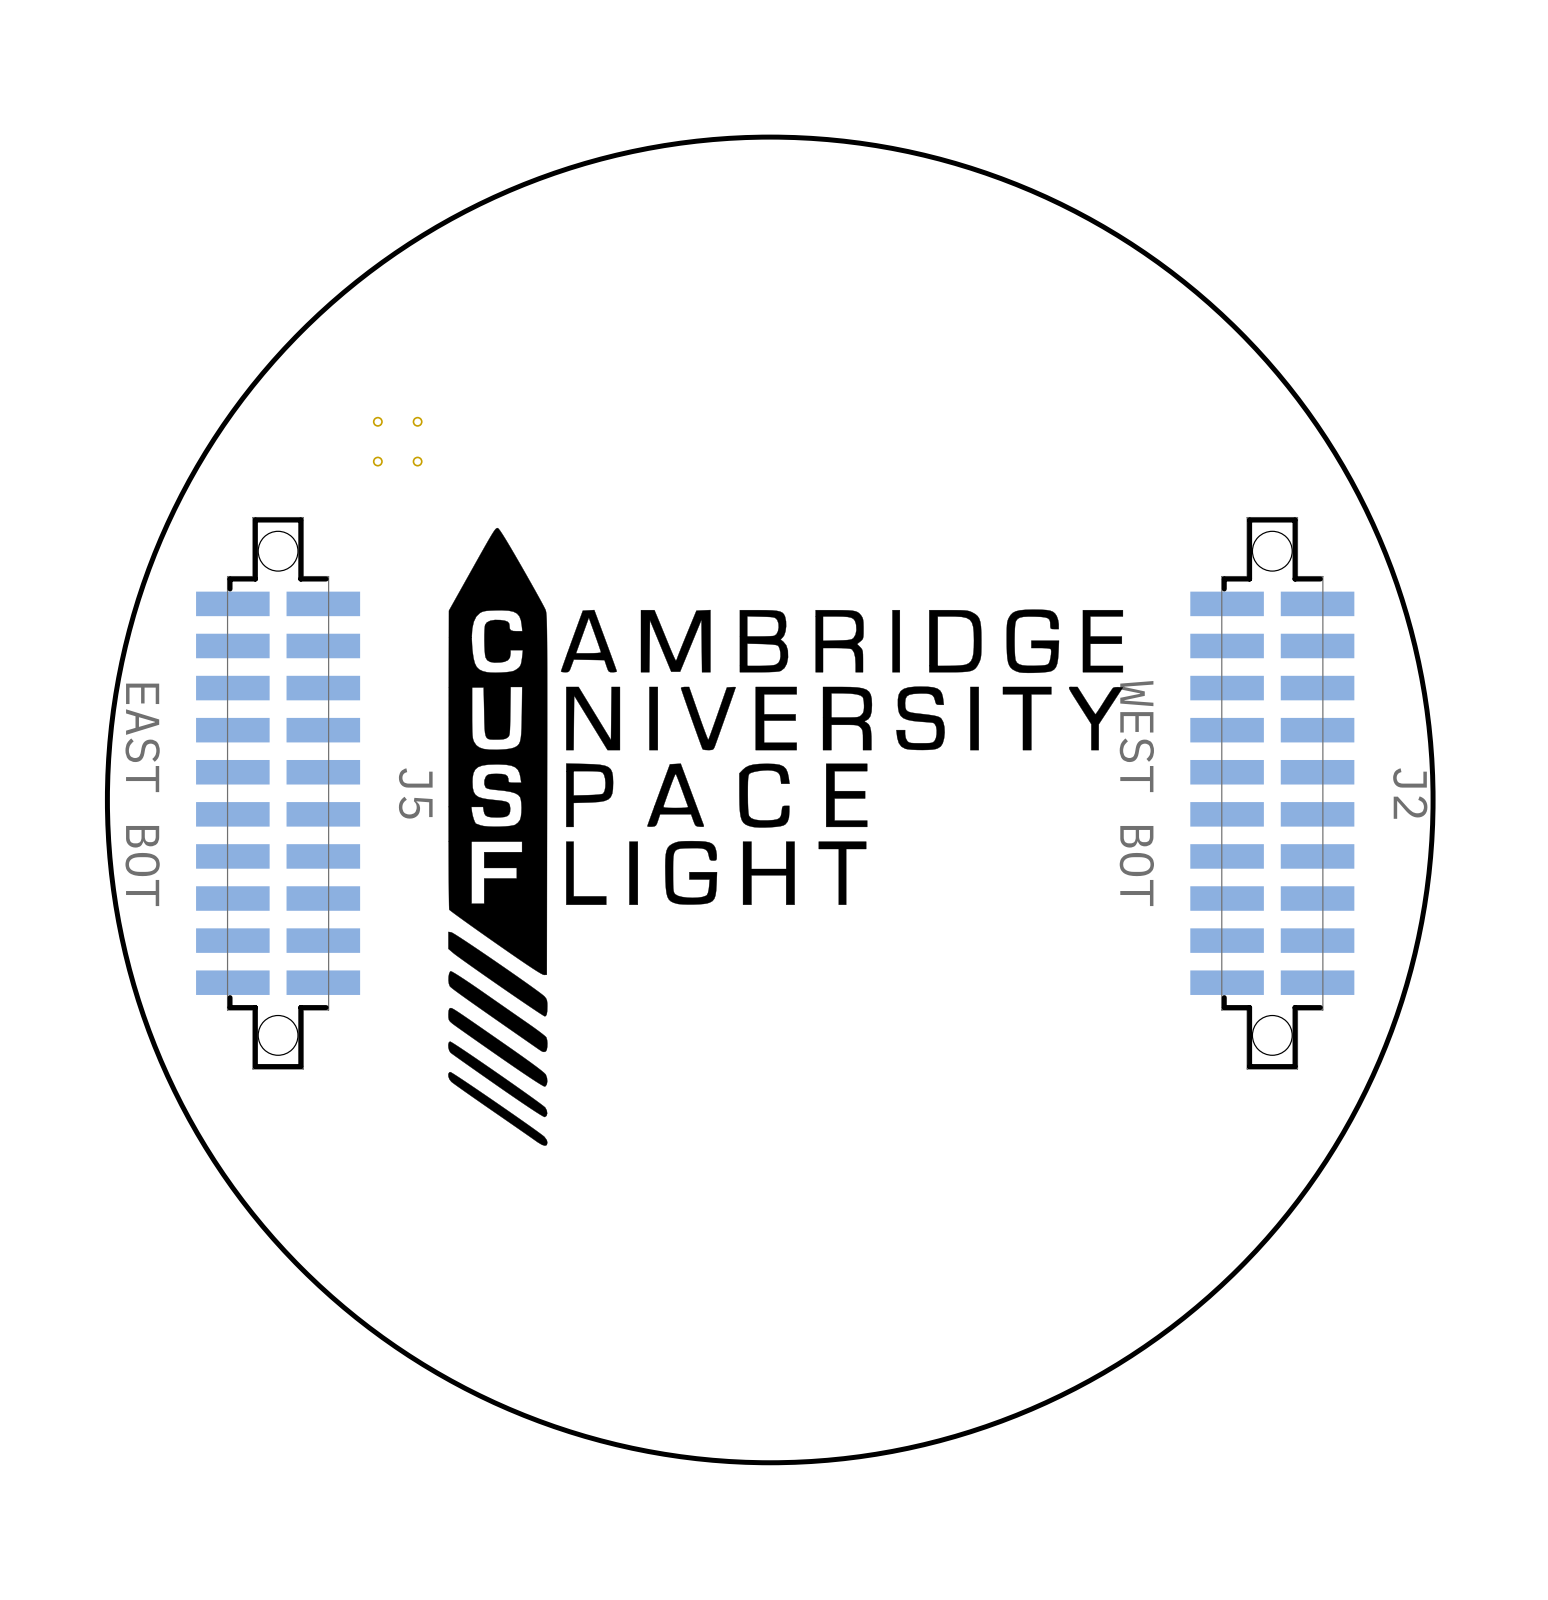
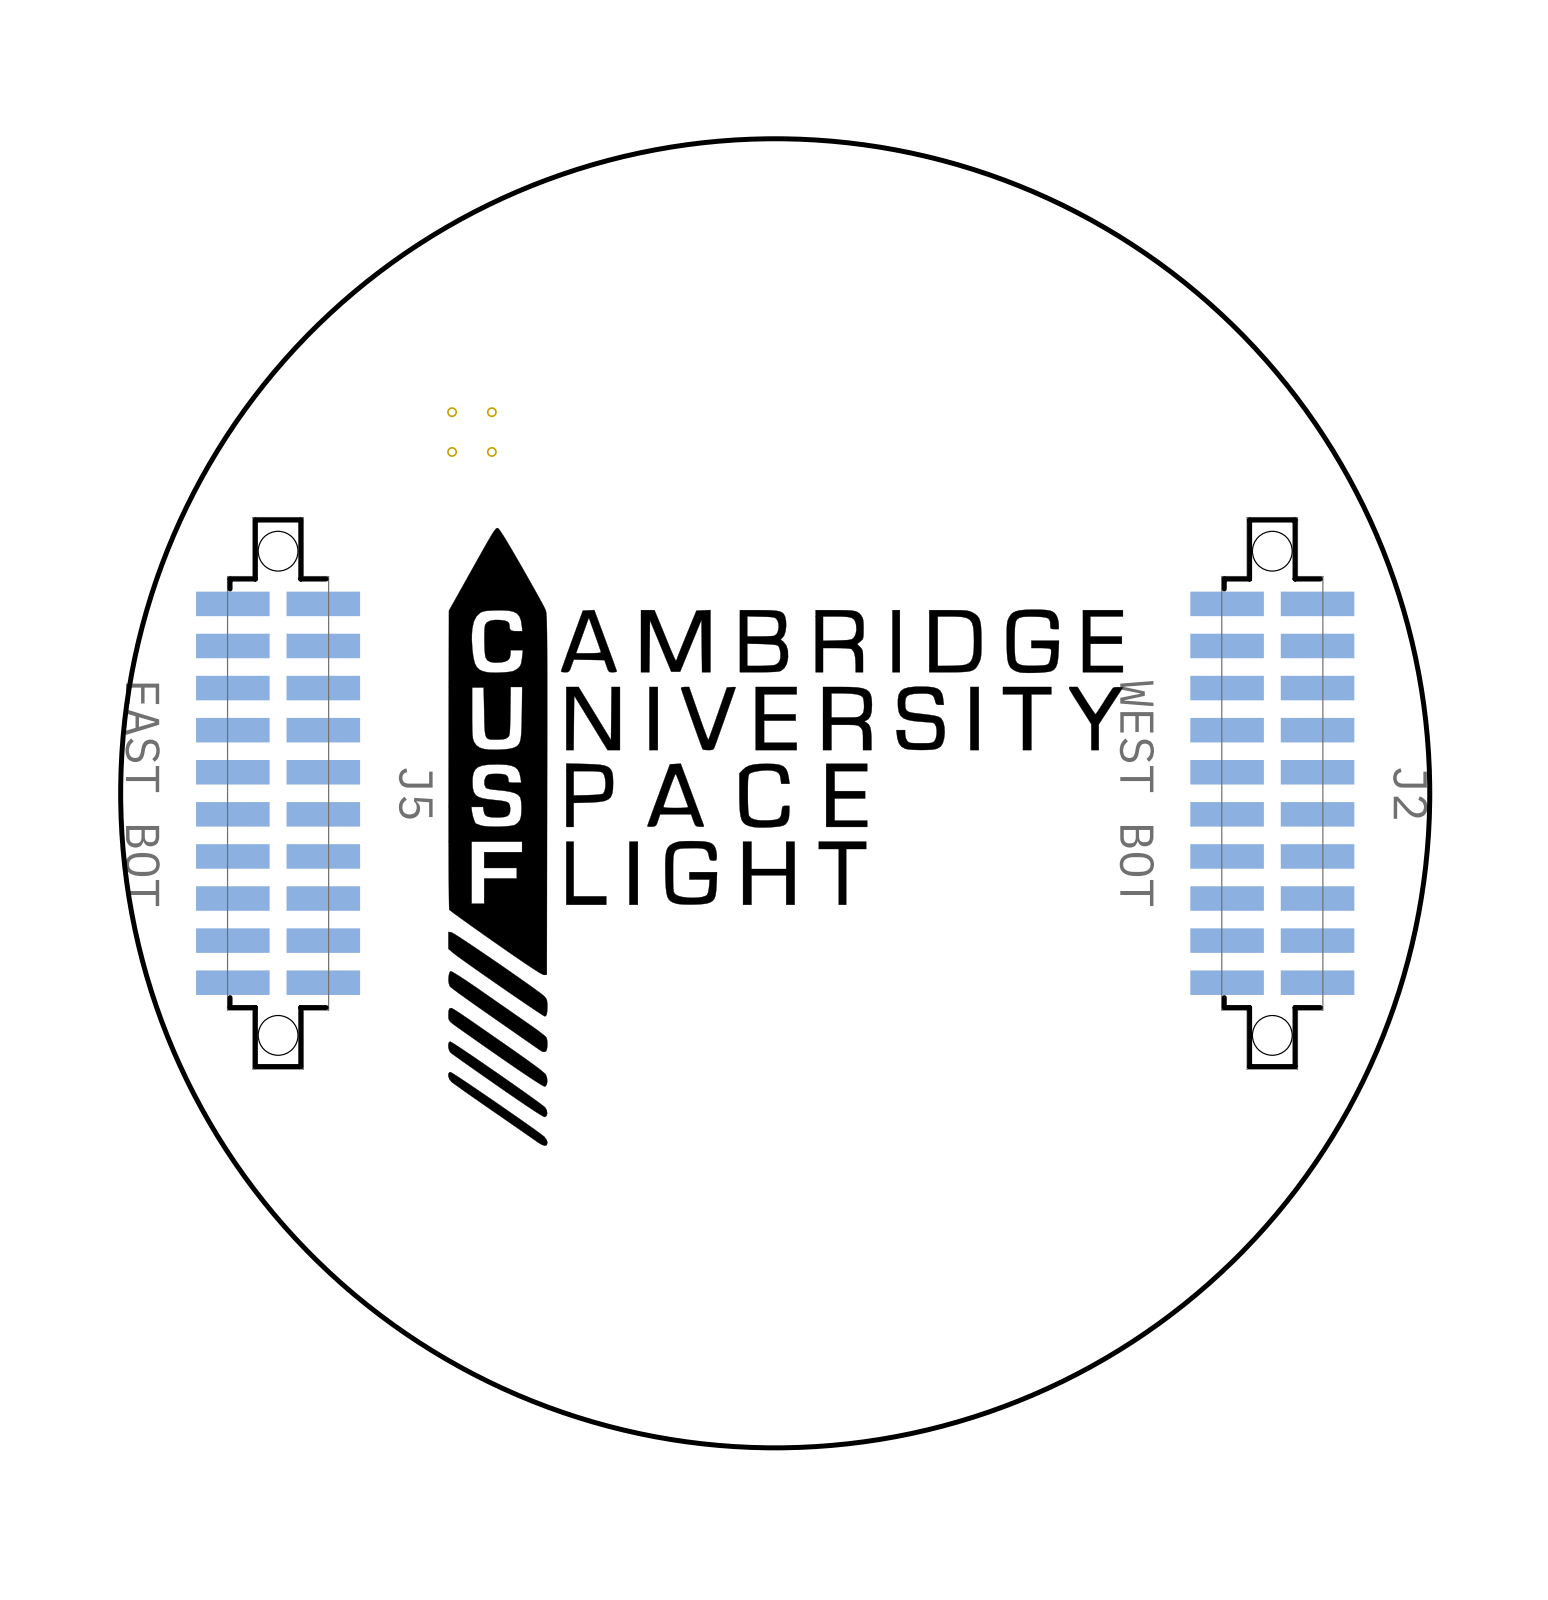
round board edge size: [104, 134, 1436, 1466] -> [118, 136, 1433, 1451]
part position: (397, 441) -> (471, 432)

